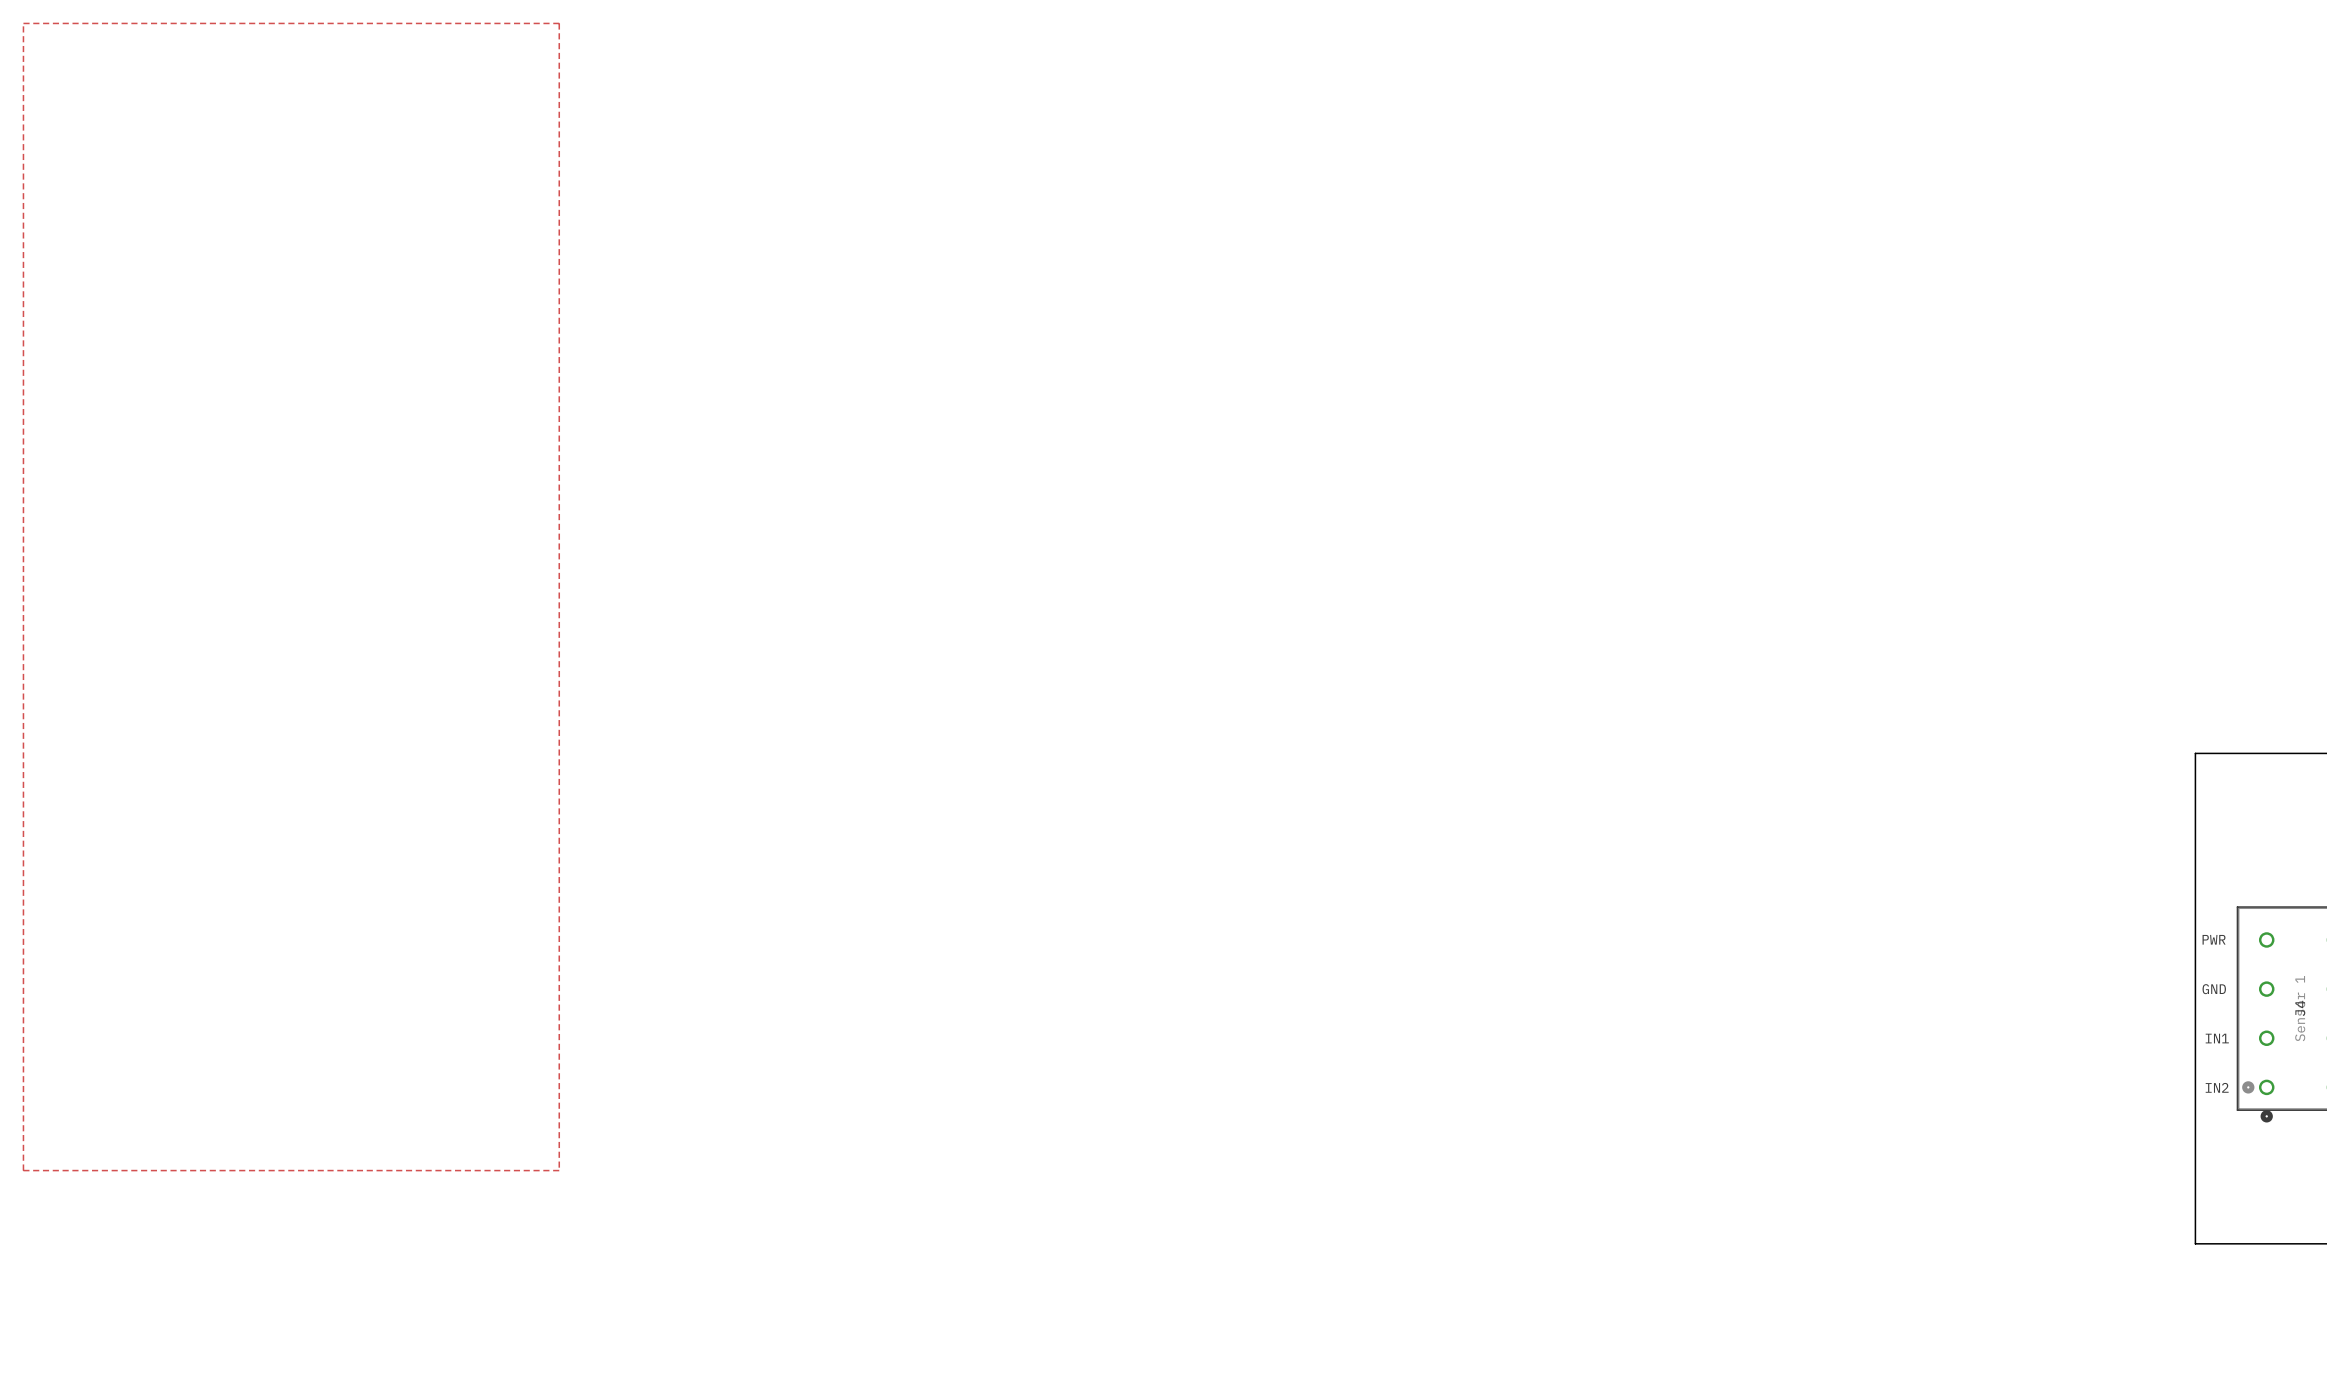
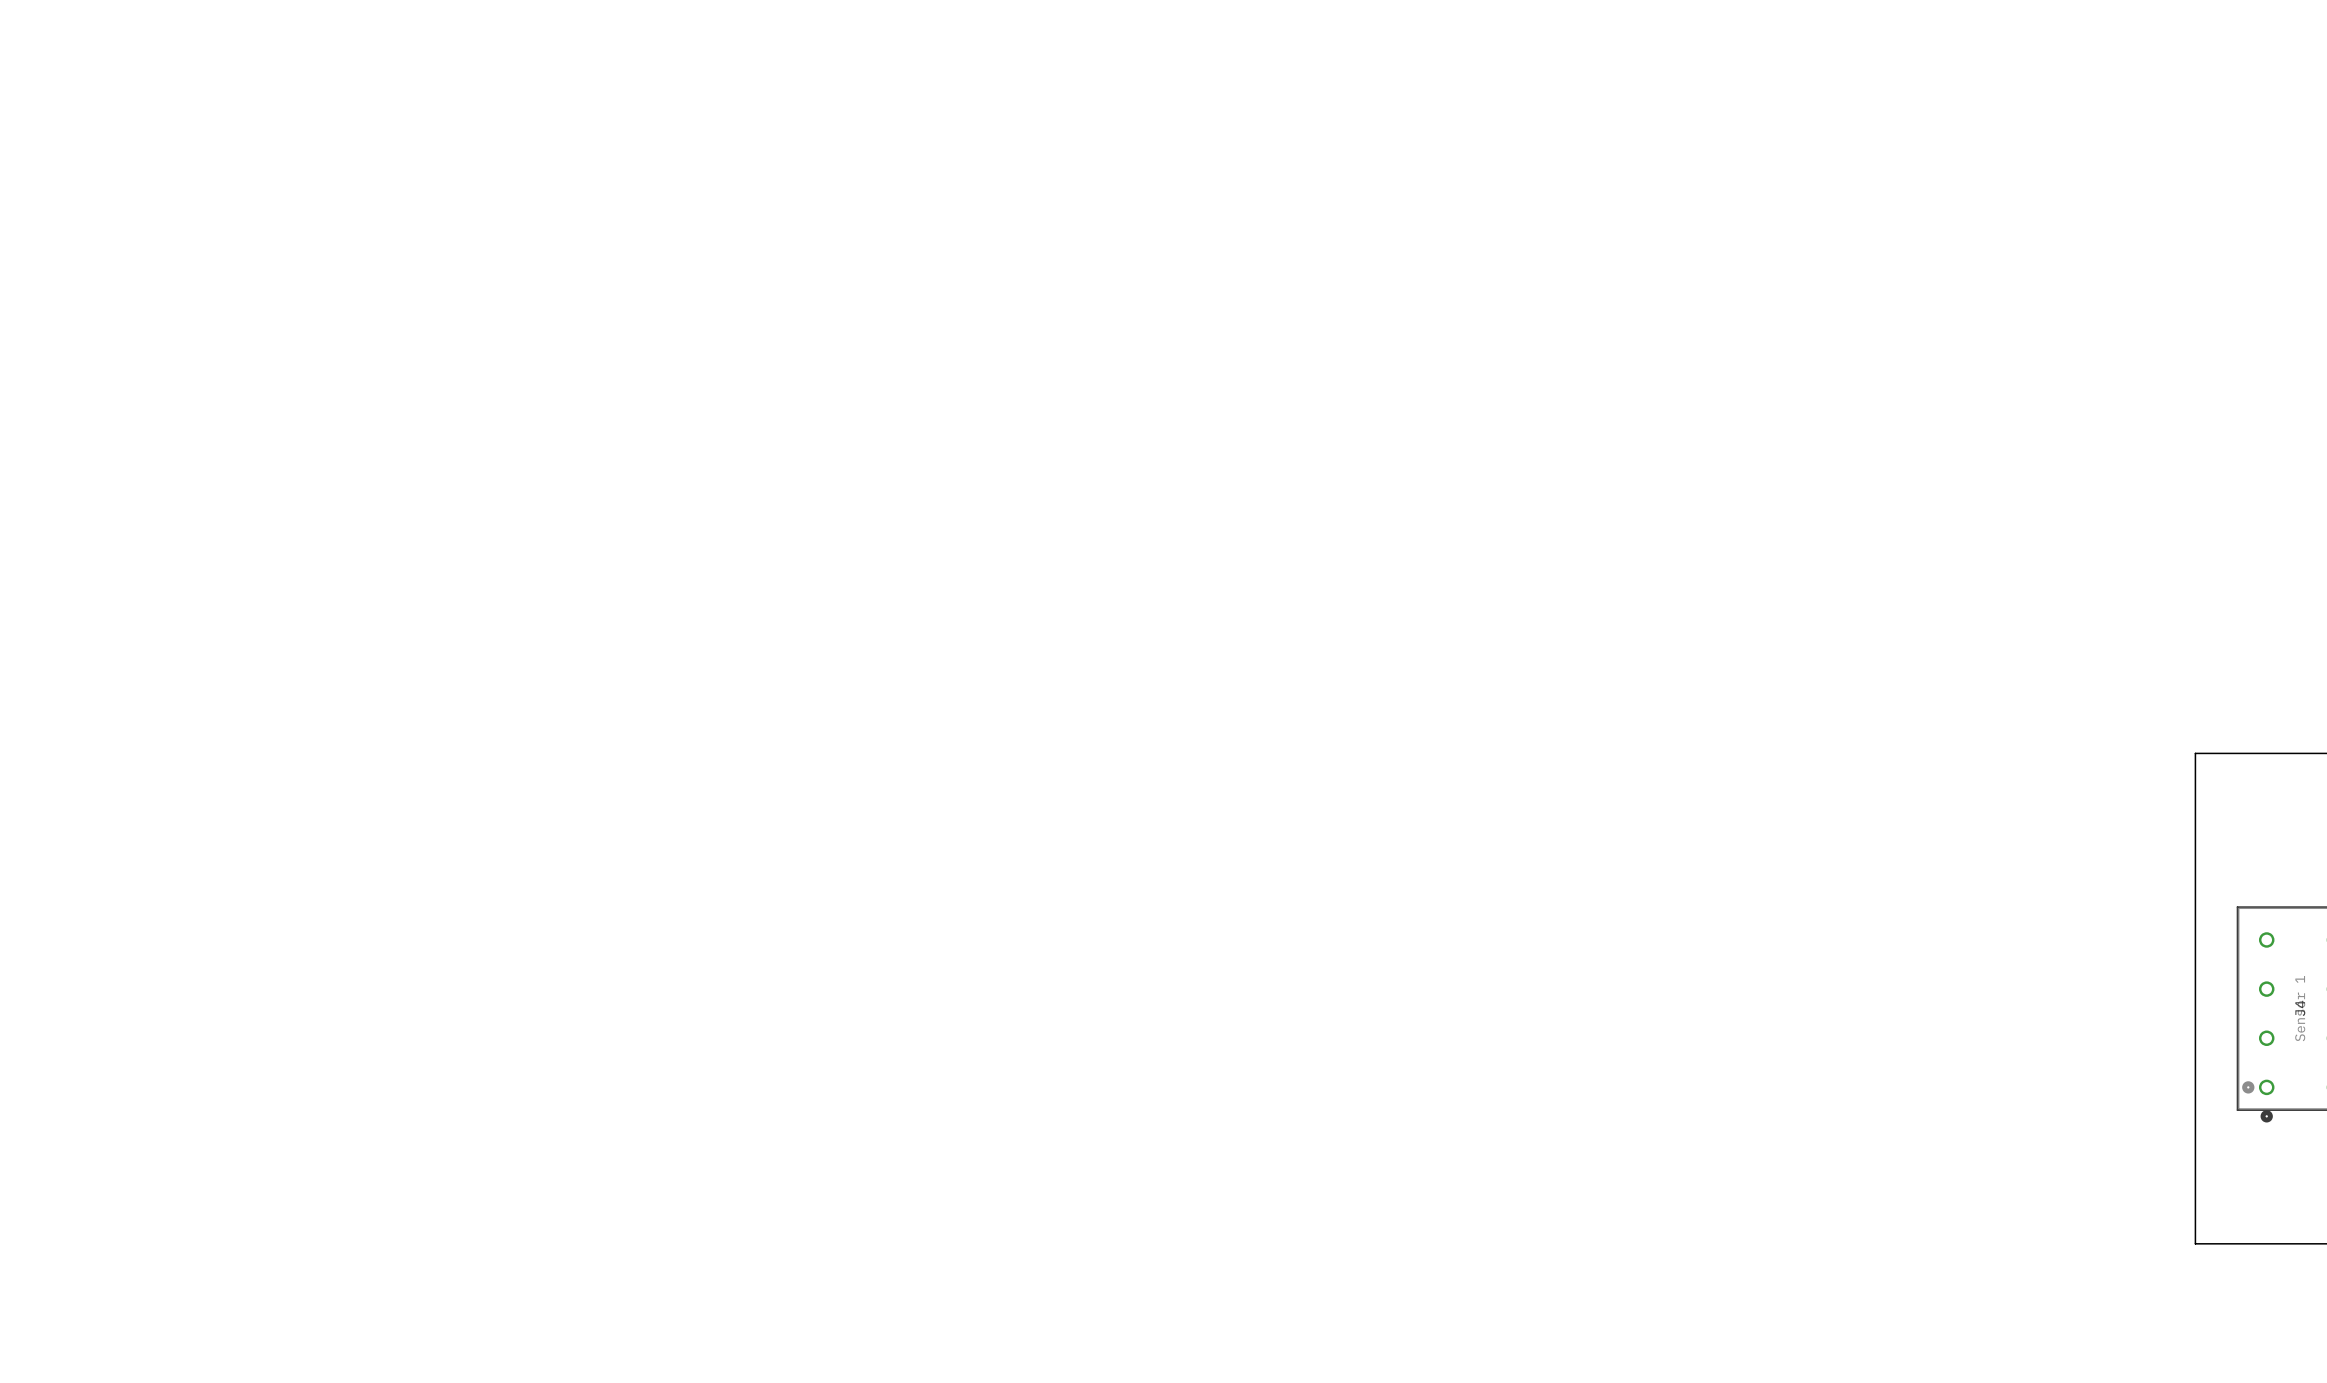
zone outline: (23, 23) (559, 23) (559, 1170) (23, 1170) (23, 23) -> none
text: PWR (2214, 939) -> none
text: GND (2214, 989) -> none
text: IN1 (2217, 1038) -> none
text: IN2 (2217, 1087) -> none

